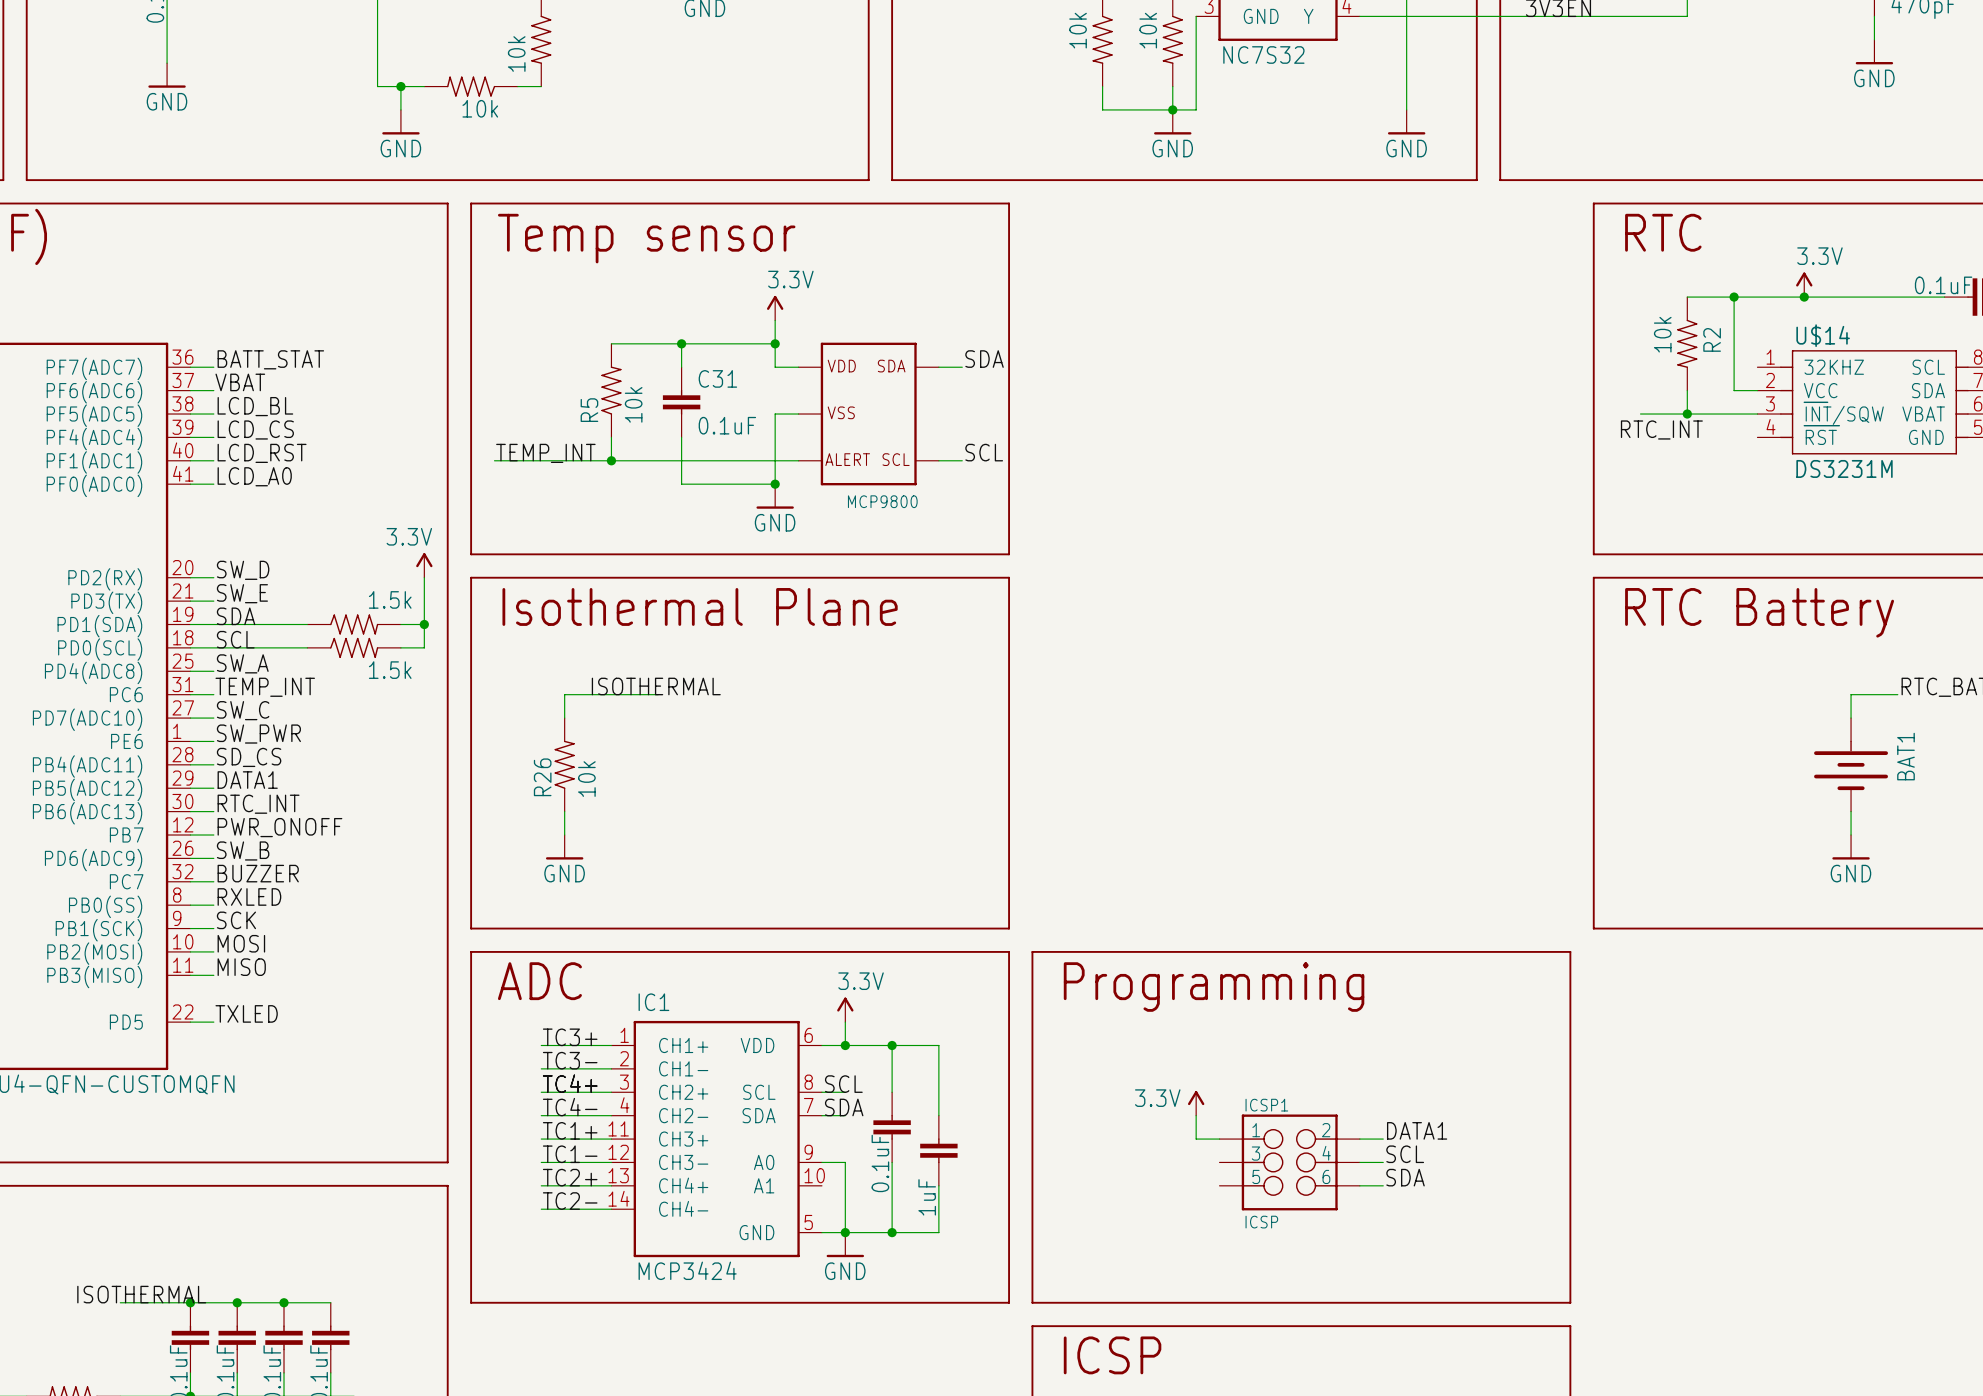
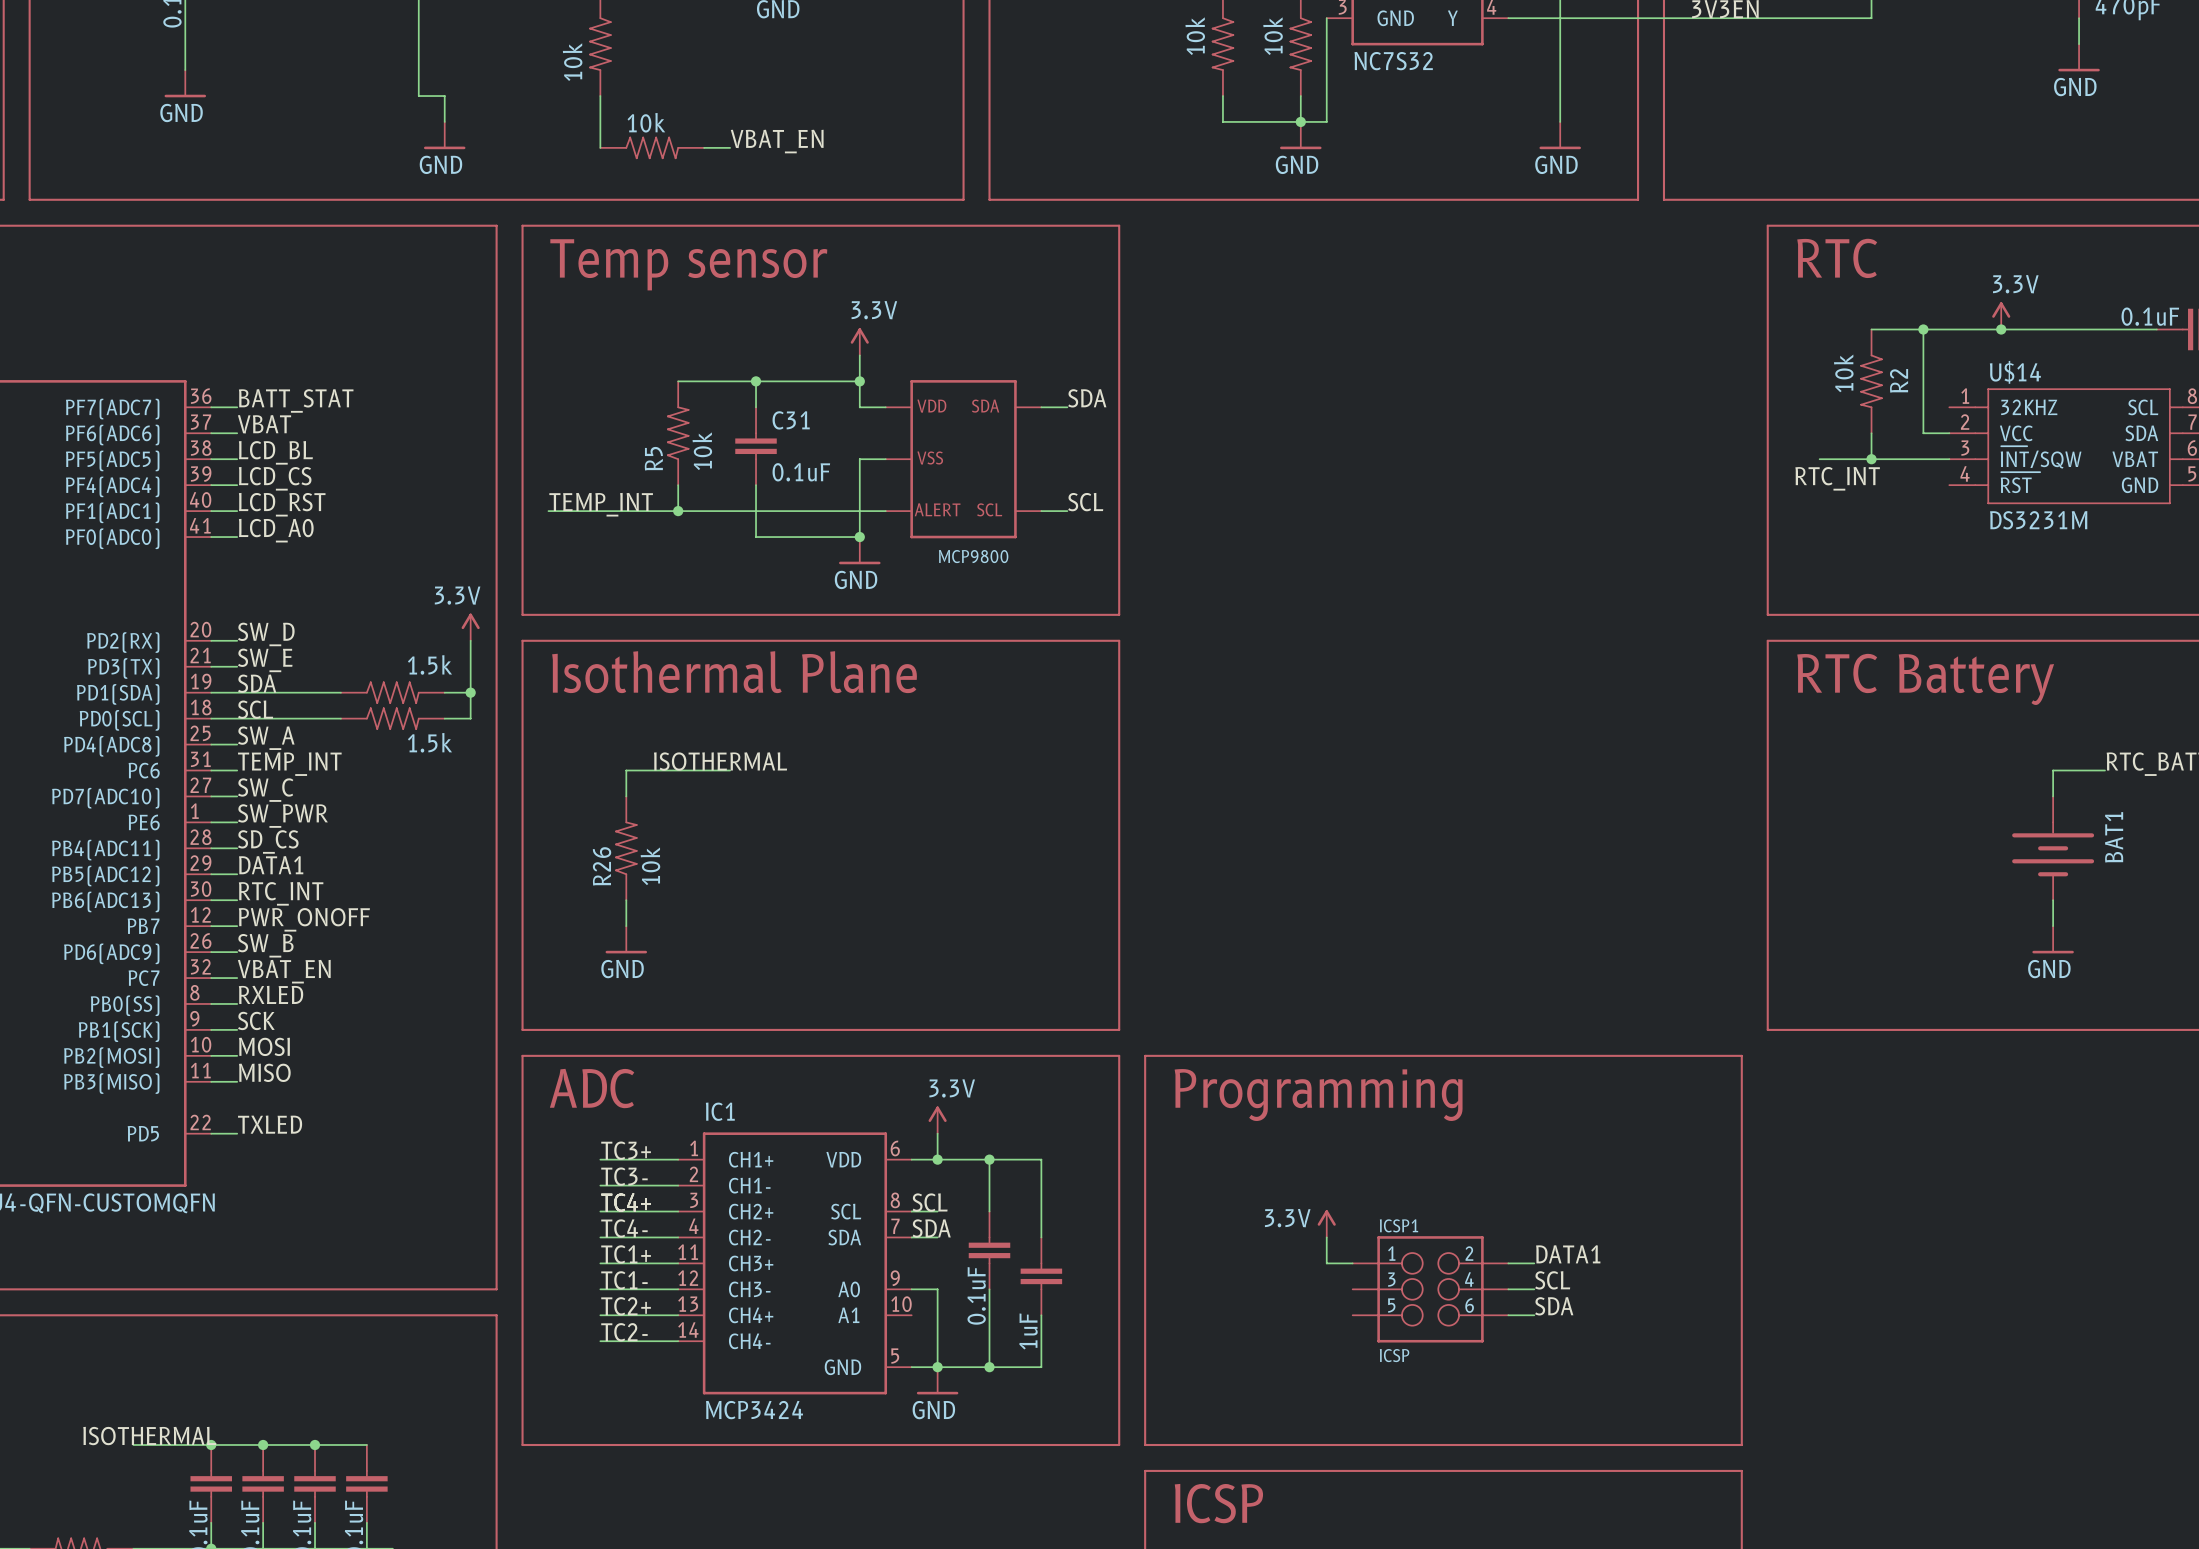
wire: (400, 86) (424, 86) -> none
junction: (400, 86) -> none
part rotation: 0° (471, 86) -> 180° (652, 147)
part position: (471, 86) -> (652, 147)
wire: (517, 86) (541, 86) -> (600, 147) (600, 96)
label: none -> VBAT_EN (777, 141)
wire: none -> (704, 147) (730, 147)
label: BUZZER (258, 873) -> VBAT_EN (284, 971)

